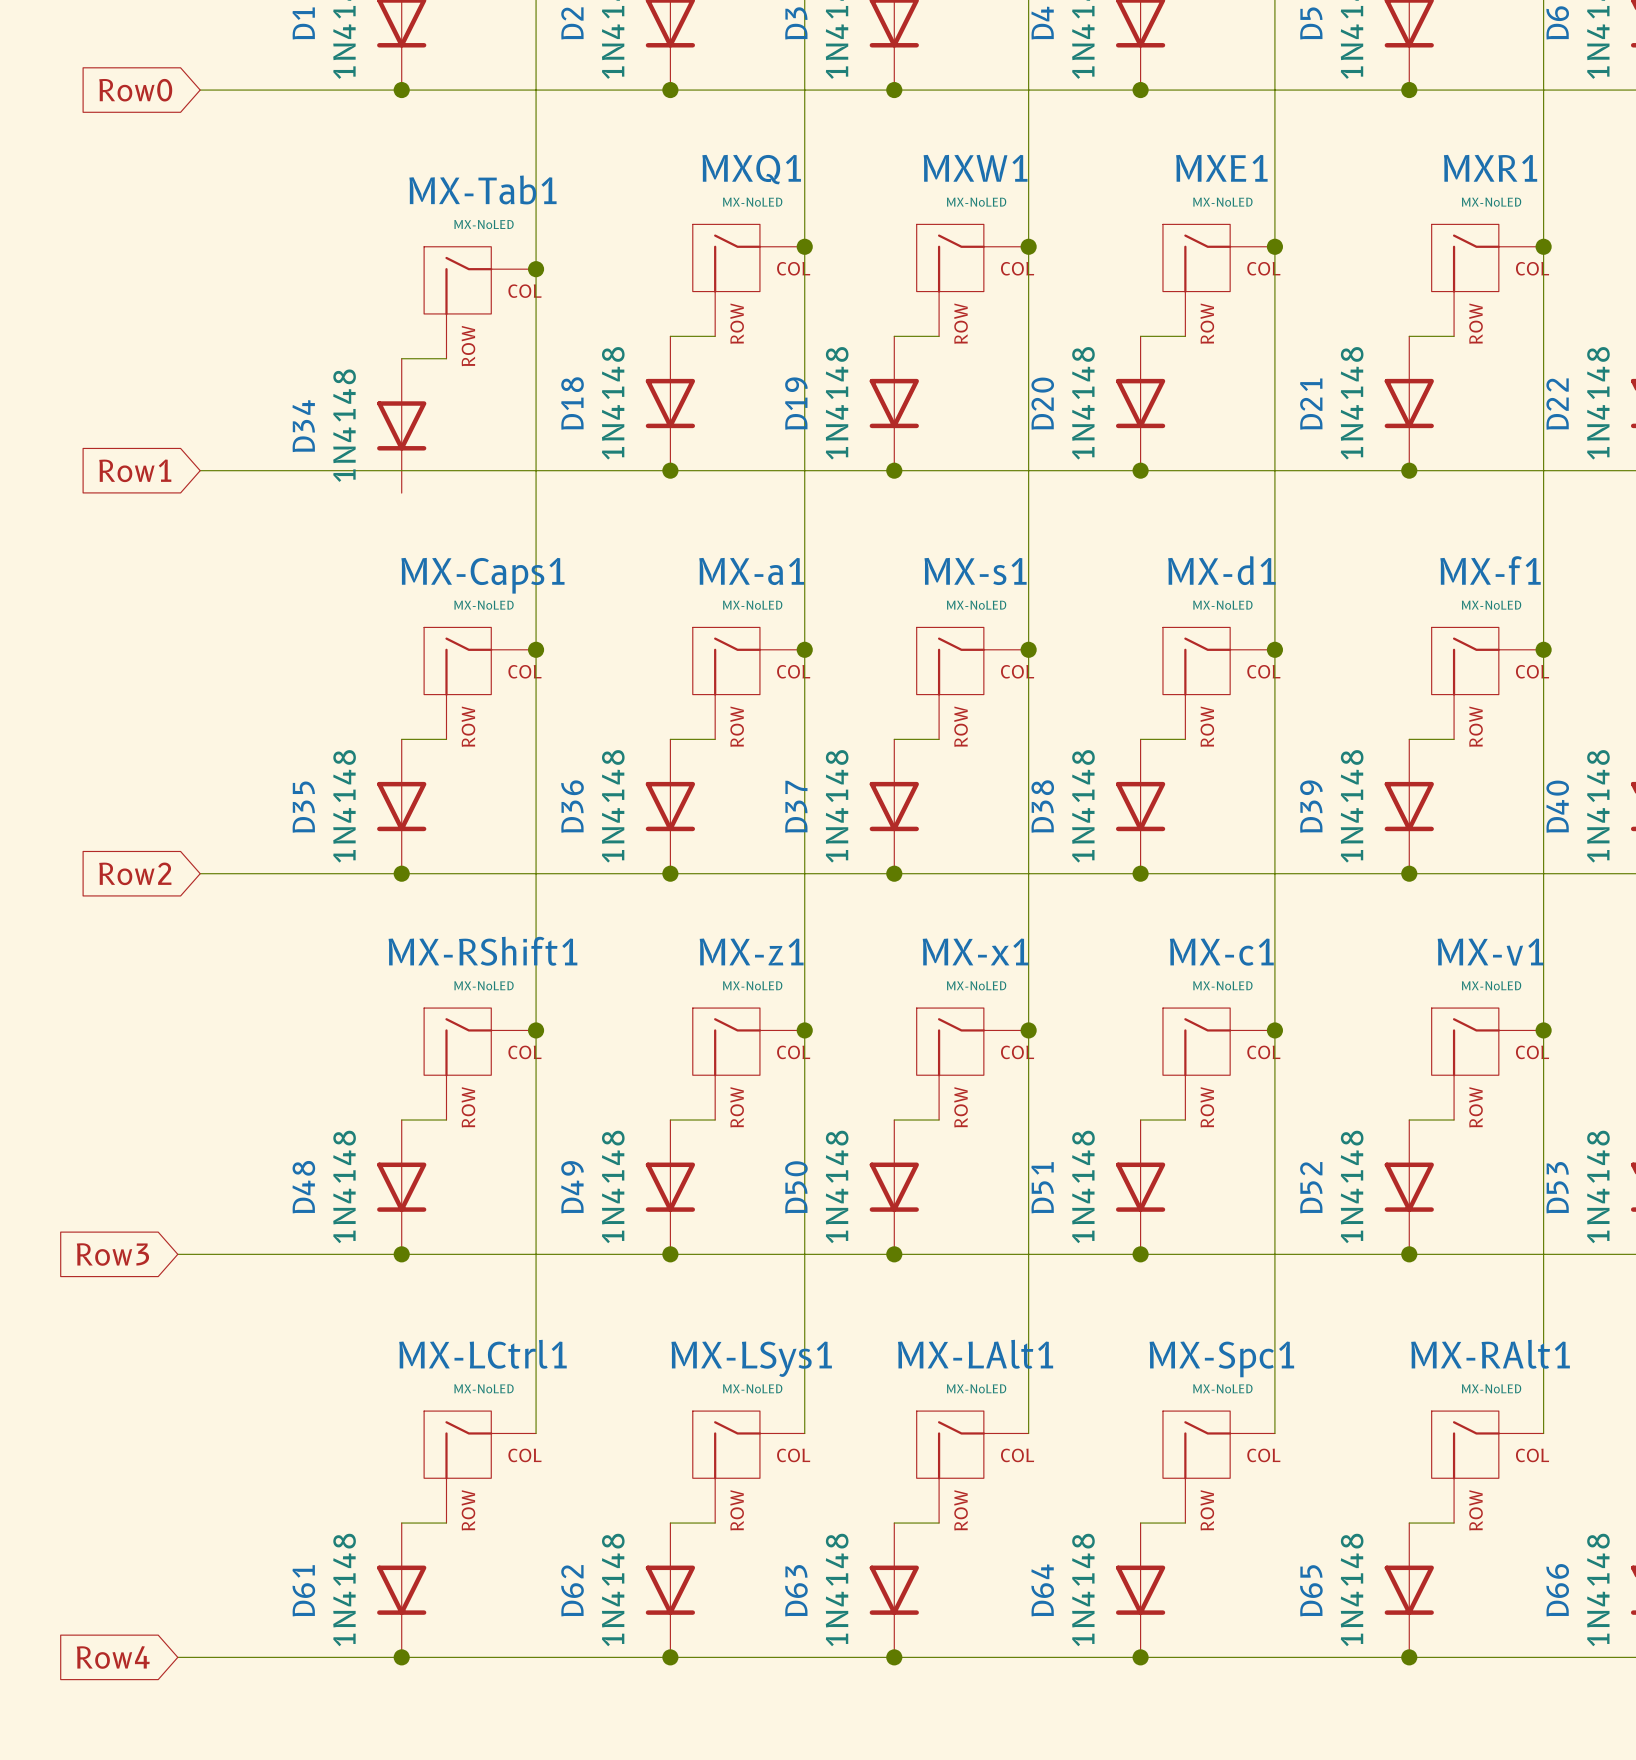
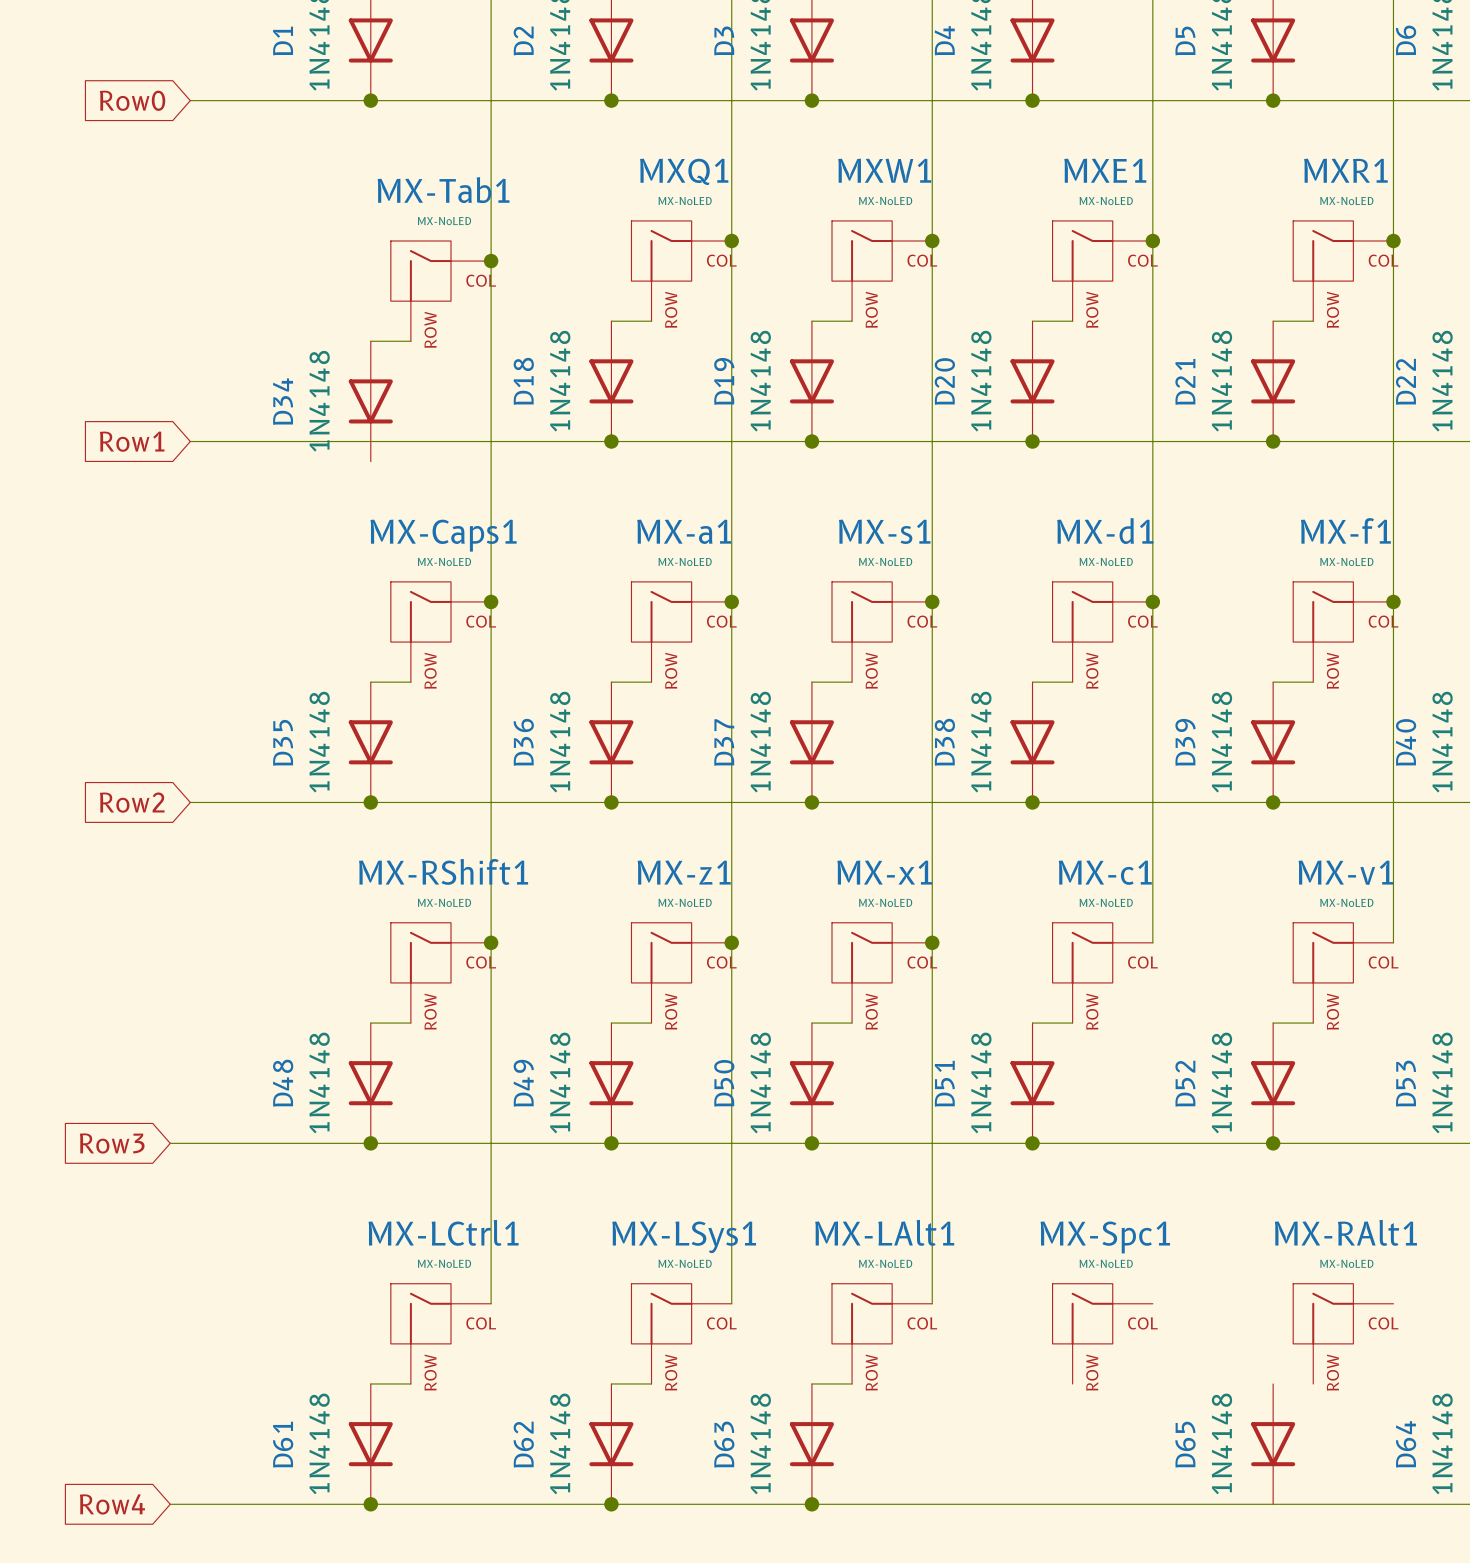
wire: (1274, 1030) (1274, 1433) -> none
junction: (1274, 1030) -> none
wire: (1543, 1030) (1543, 1433) -> none
junction: (1543, 1030) -> none
wire: (1140, 1523) (1185, 1523) -> none
wire: (1409, 1523) (1454, 1523) -> none
D64: 1N4148 (1140, 1590) -> none
D66 name: D66 (1557, 1590) -> D64 (1406, 1444)
junction: (1140, 1657) -> none
junction: (1409, 1657) -> none

